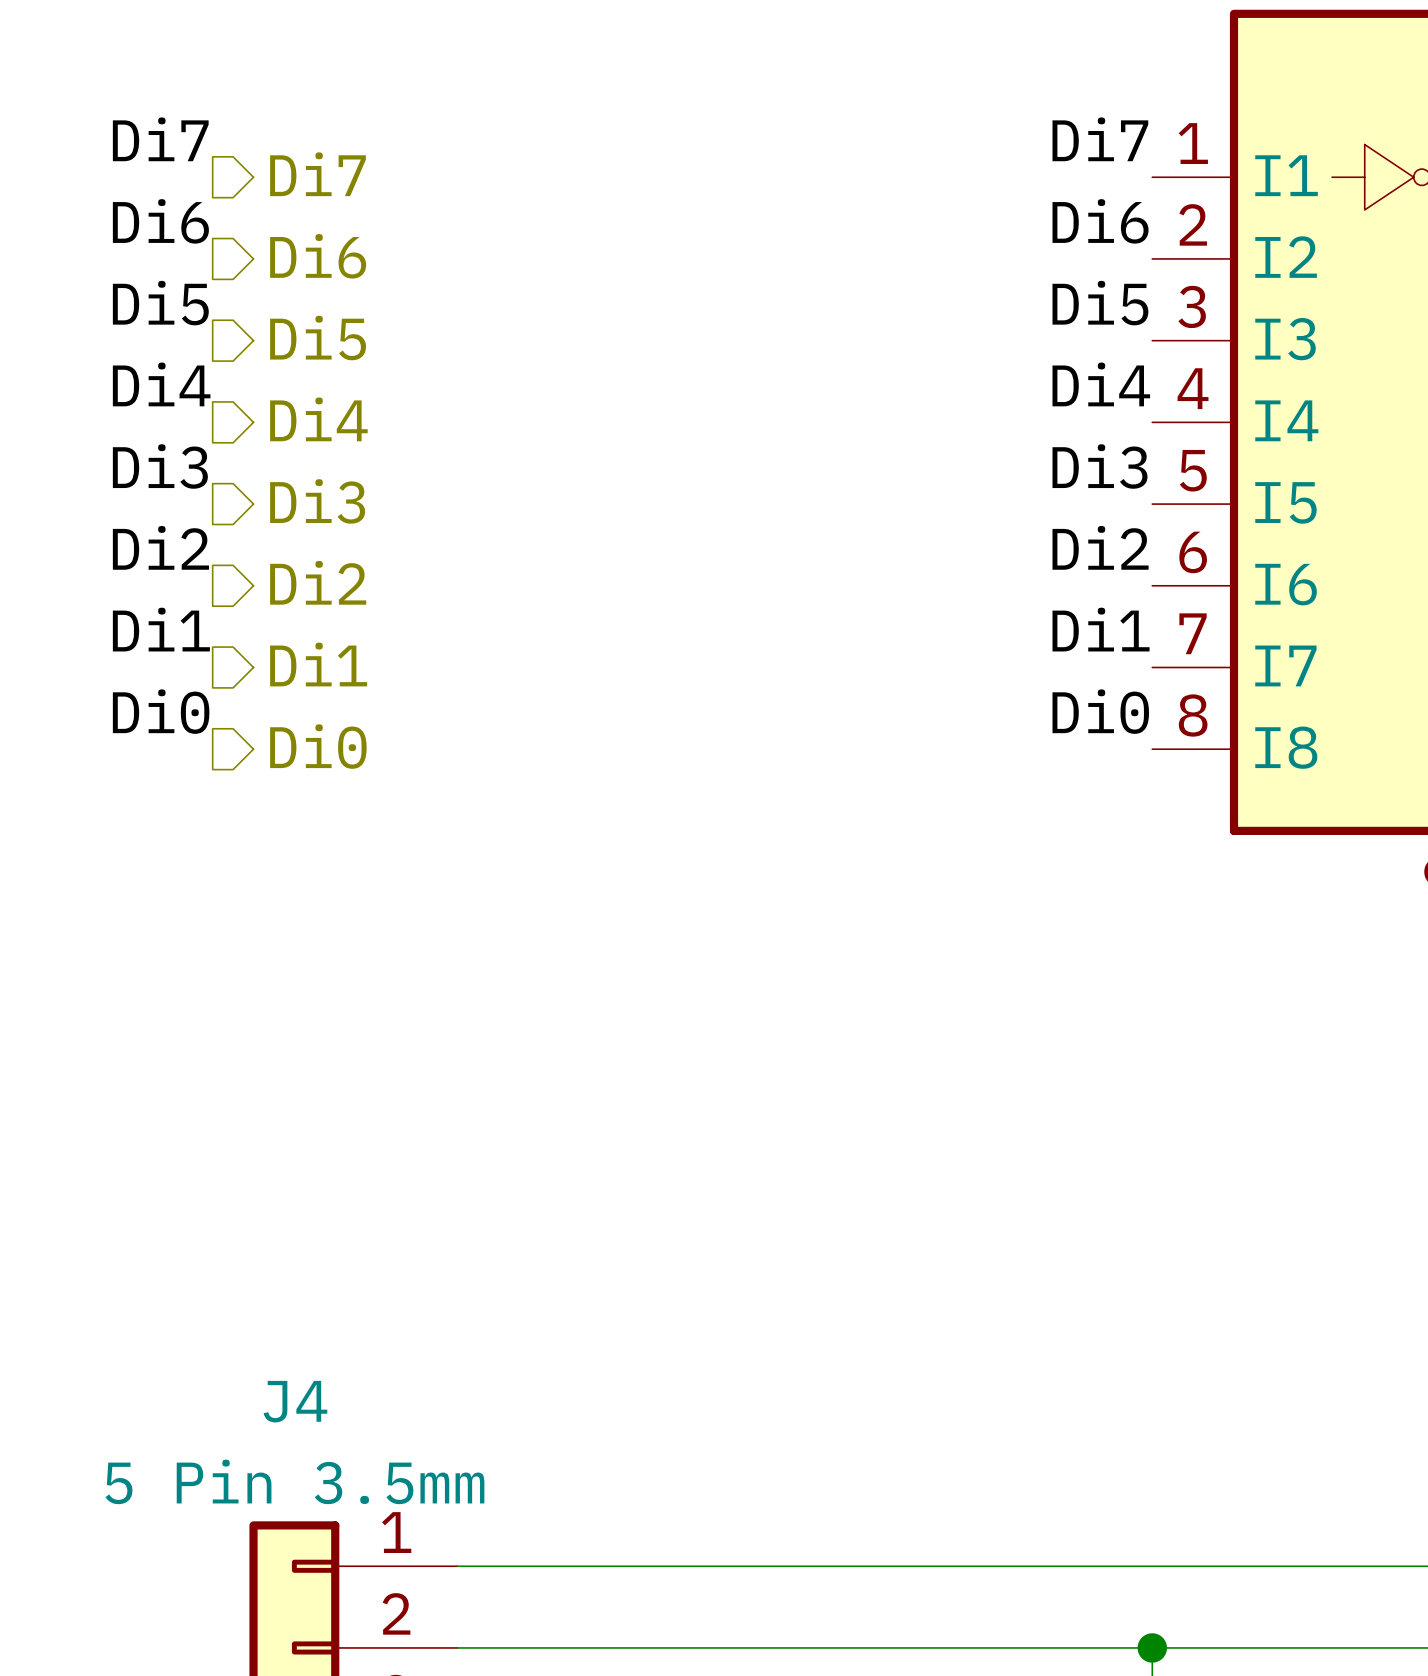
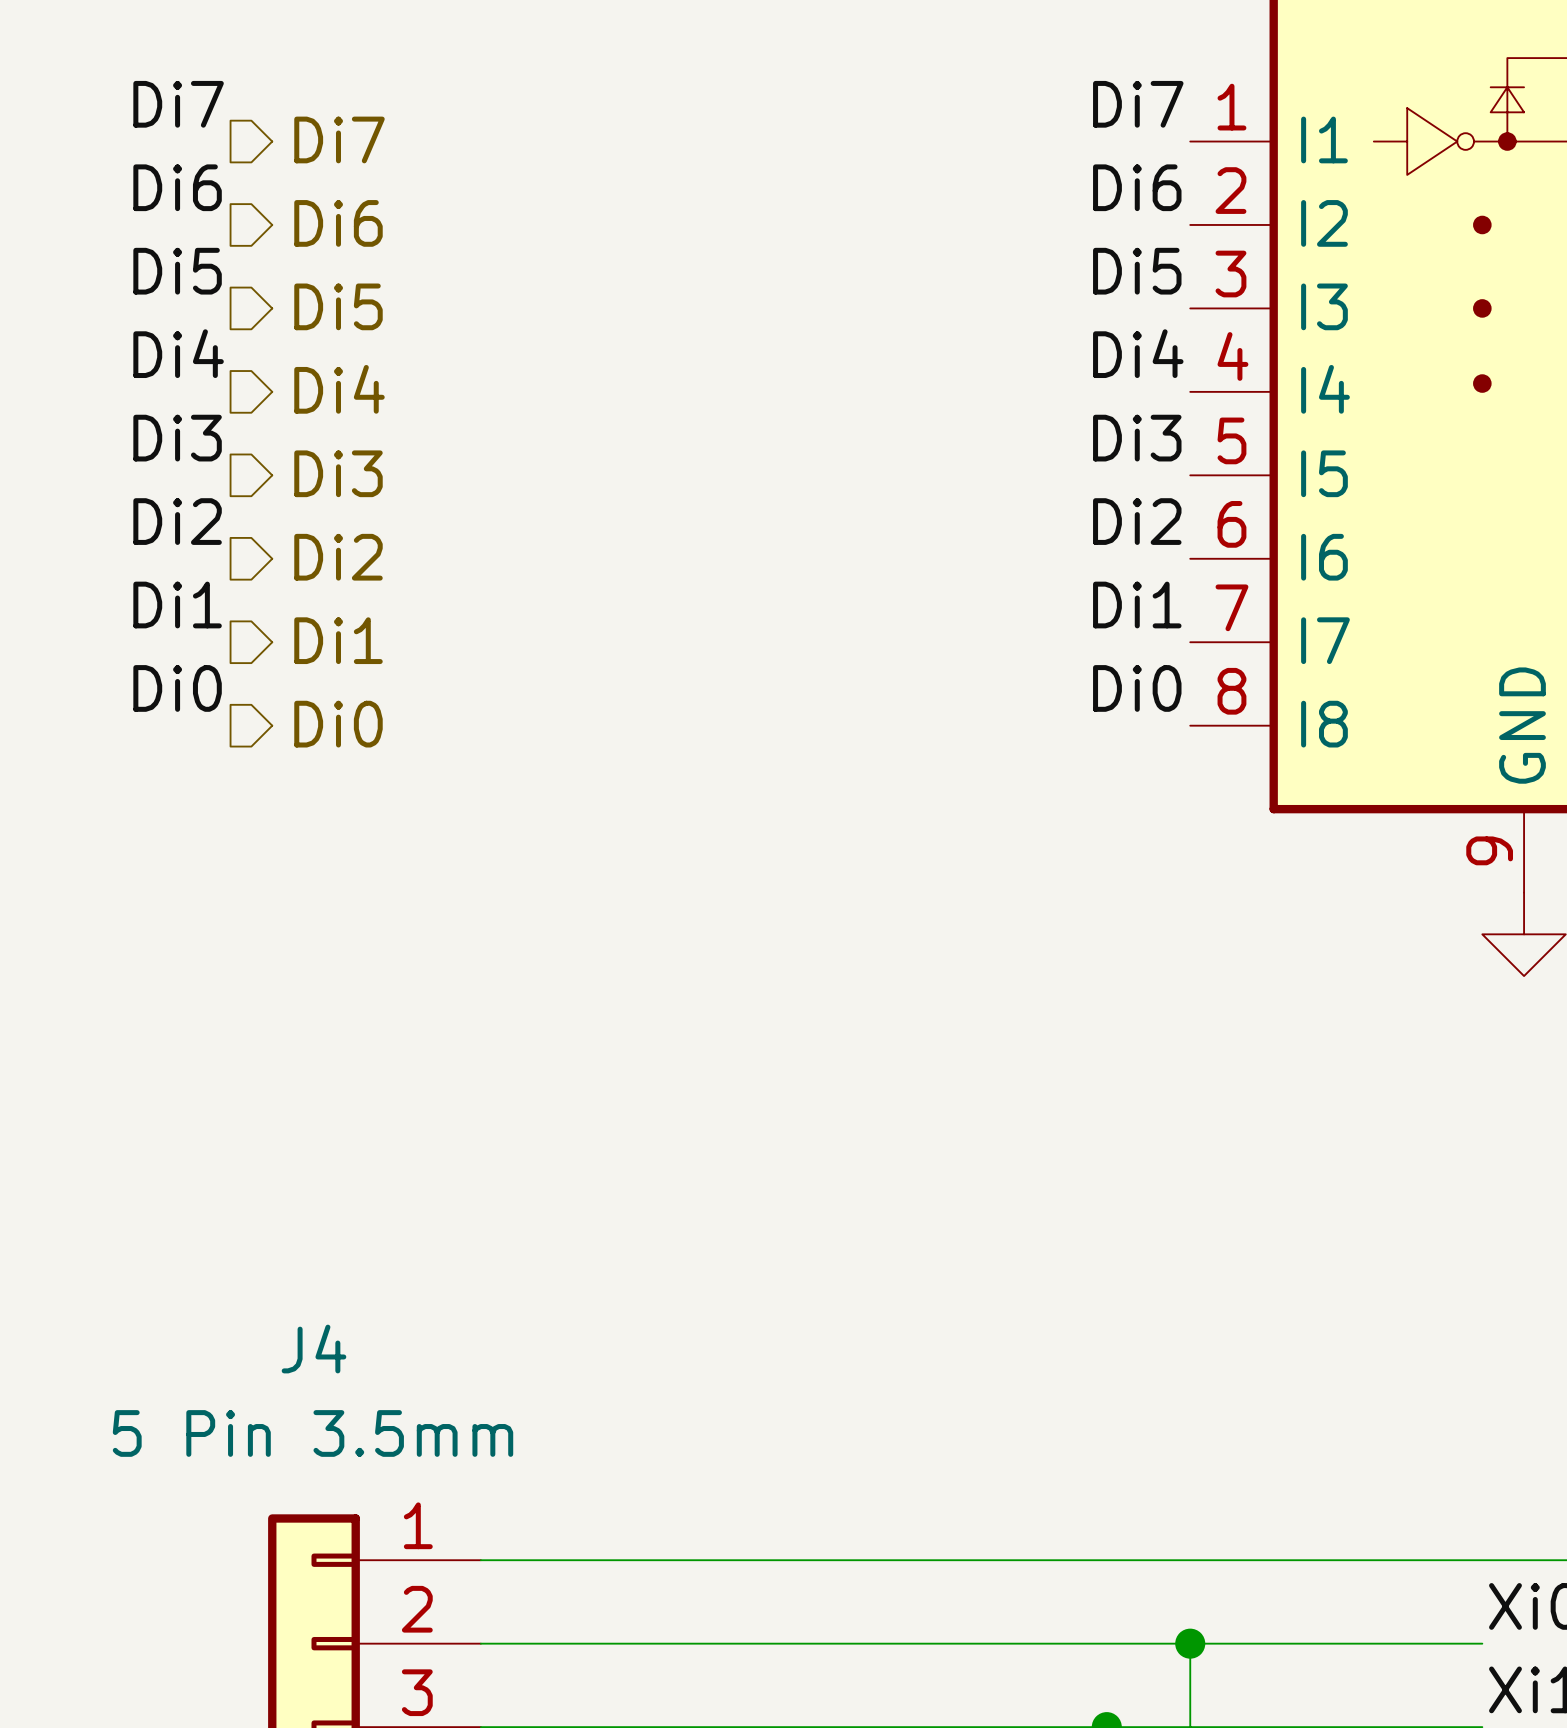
J4 name position: J4 (295, 1401) -> J4 (313, 1349)
J4 value position: 5 Pin 3.5mm (294, 1481) -> 5 Pin 3.5mm (313, 1433)

